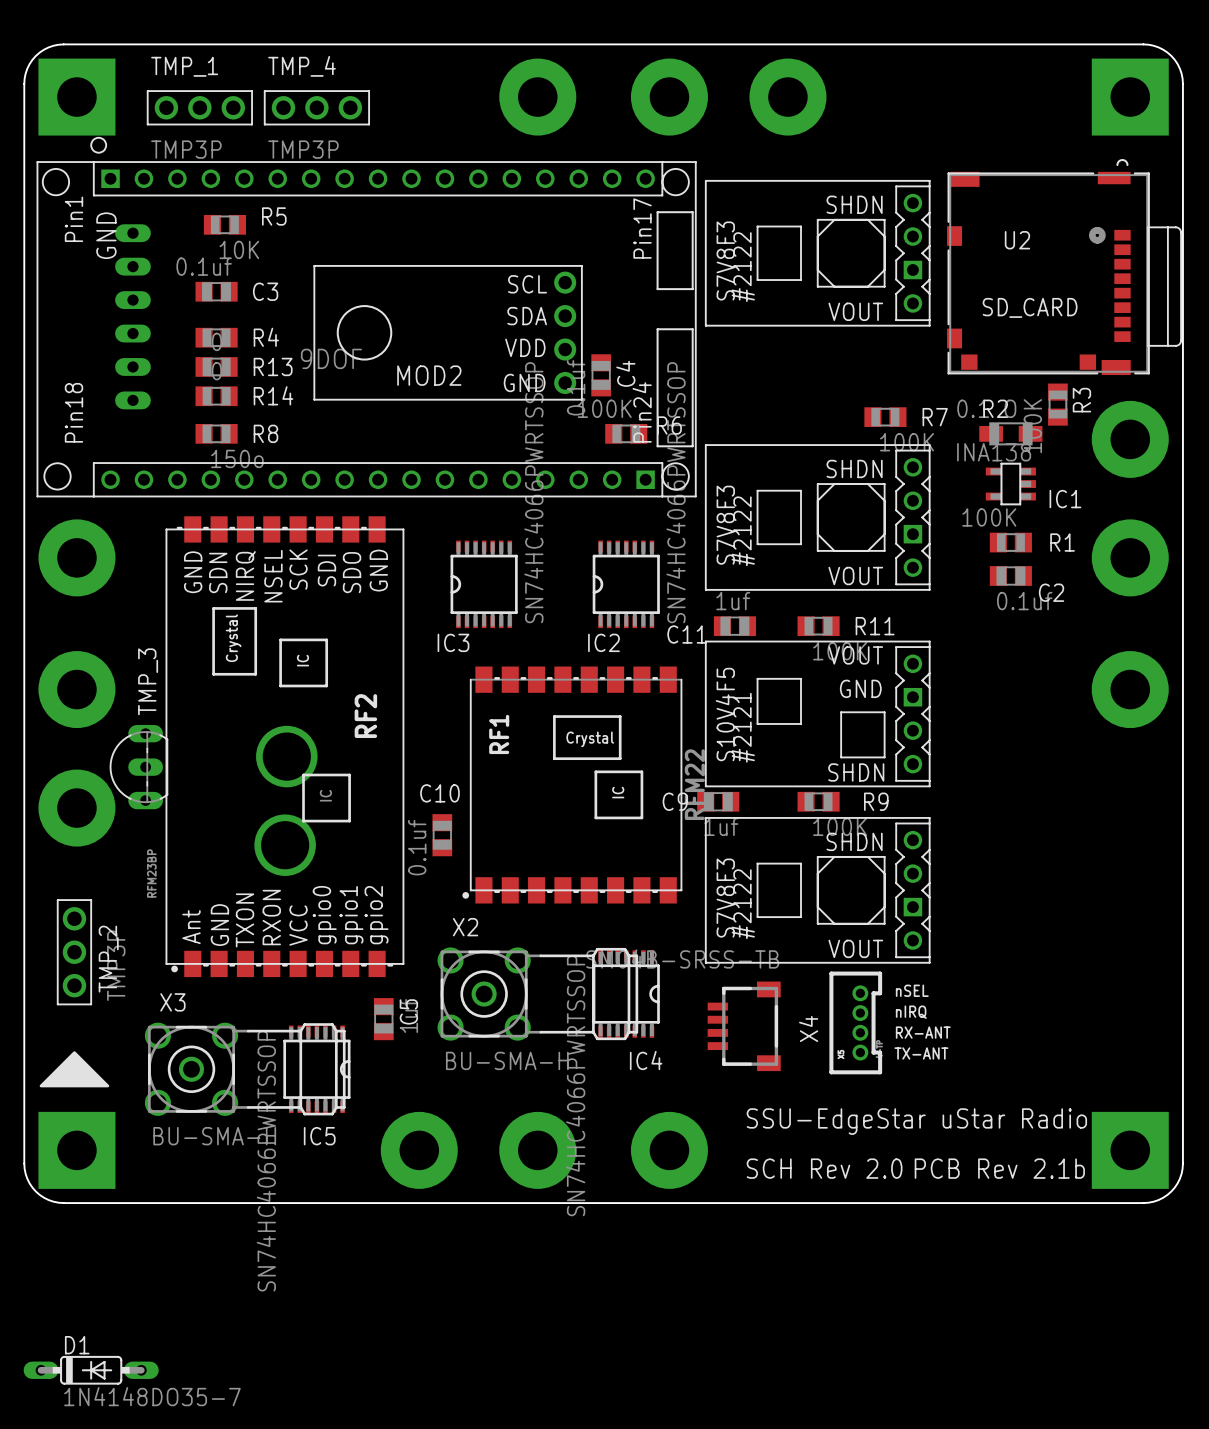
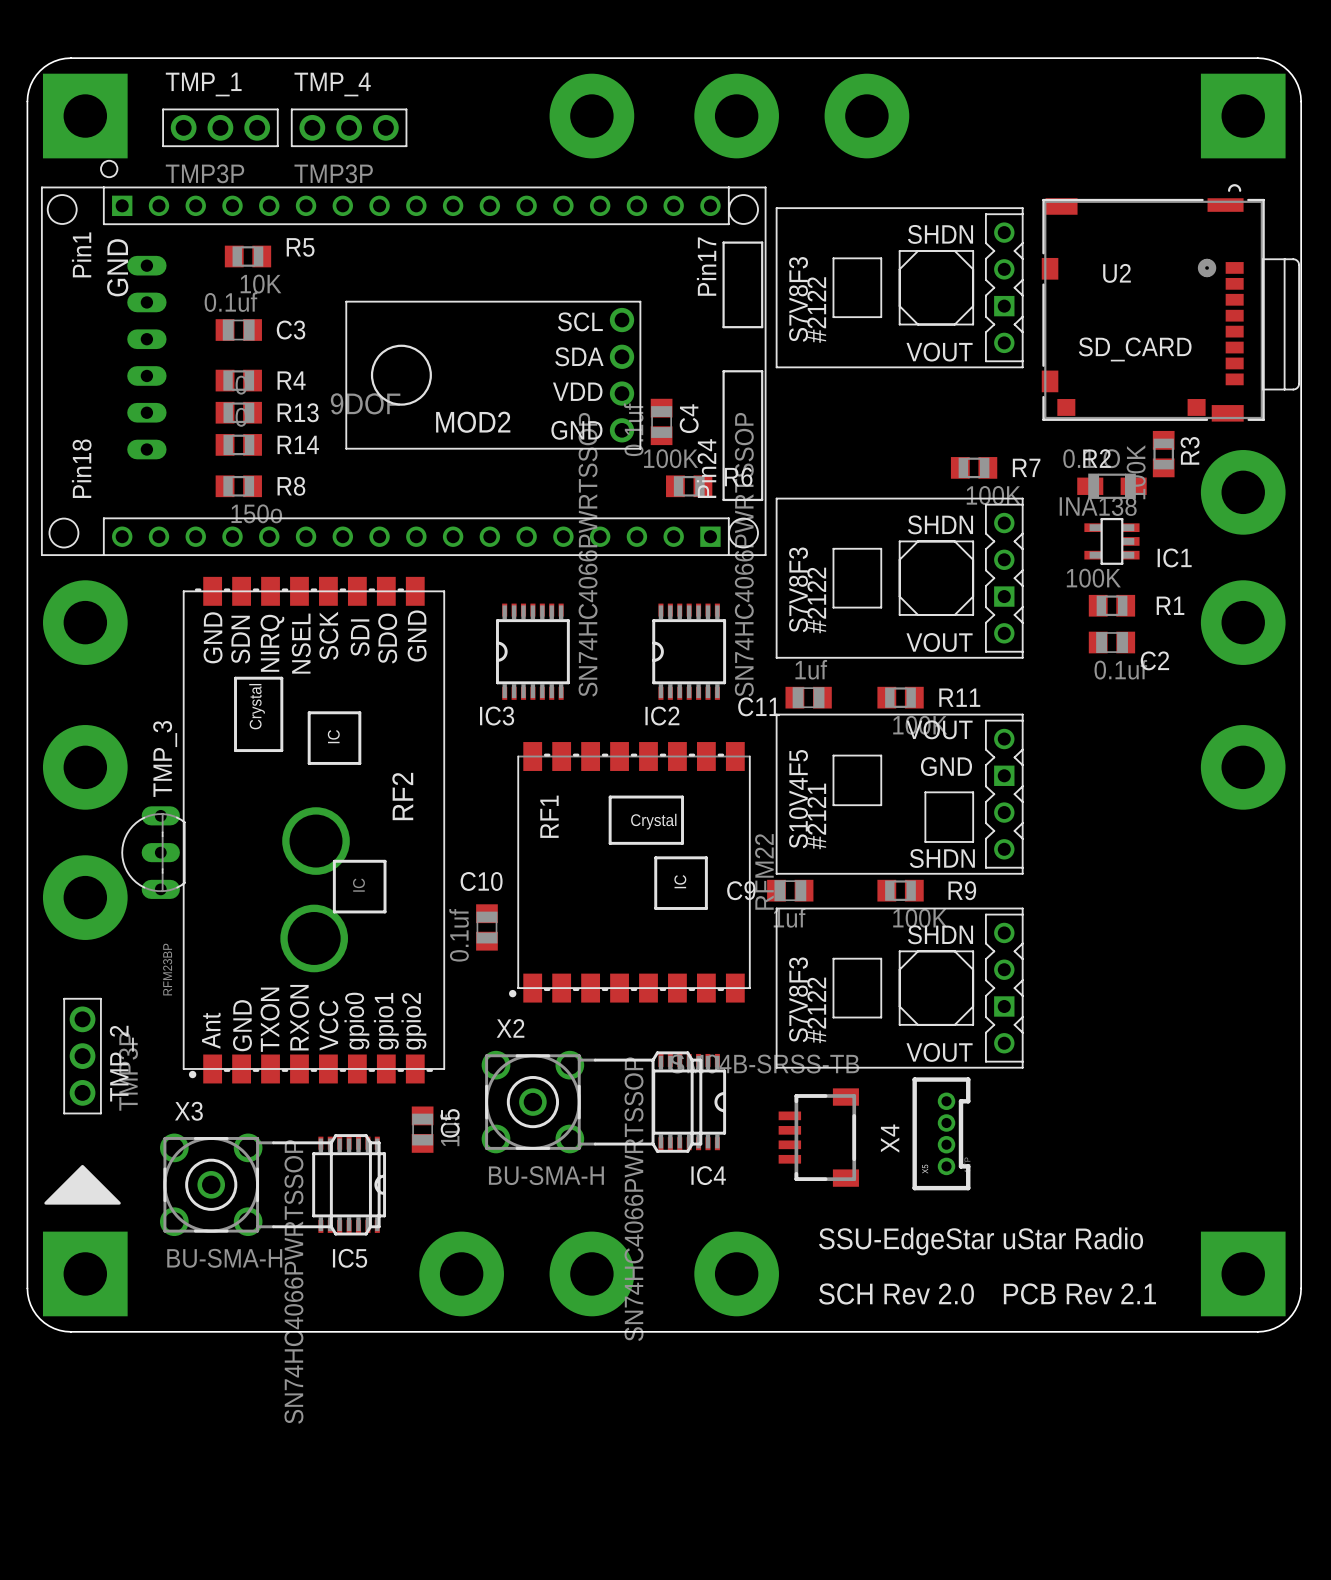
text: nSEL (912, 990) -> none
text: nIRQ (911, 1012) -> none
text: RX-ANT (923, 1032) -> none
text: TX-ANT (921, 1053) -> none
text: PCB Rev 2.1b (999, 1168) -> PCB Rev 2.1 (1079, 1293)
D1: 1N4148DO35-7 (91, 1370) -> none

